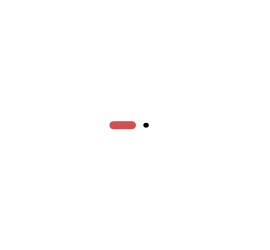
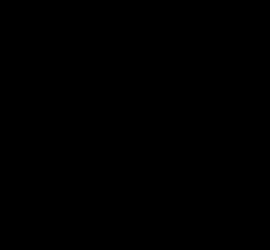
top track: (113, 125) (131, 125) -> none
board edge: (145, 125) (146, 125) -> none

